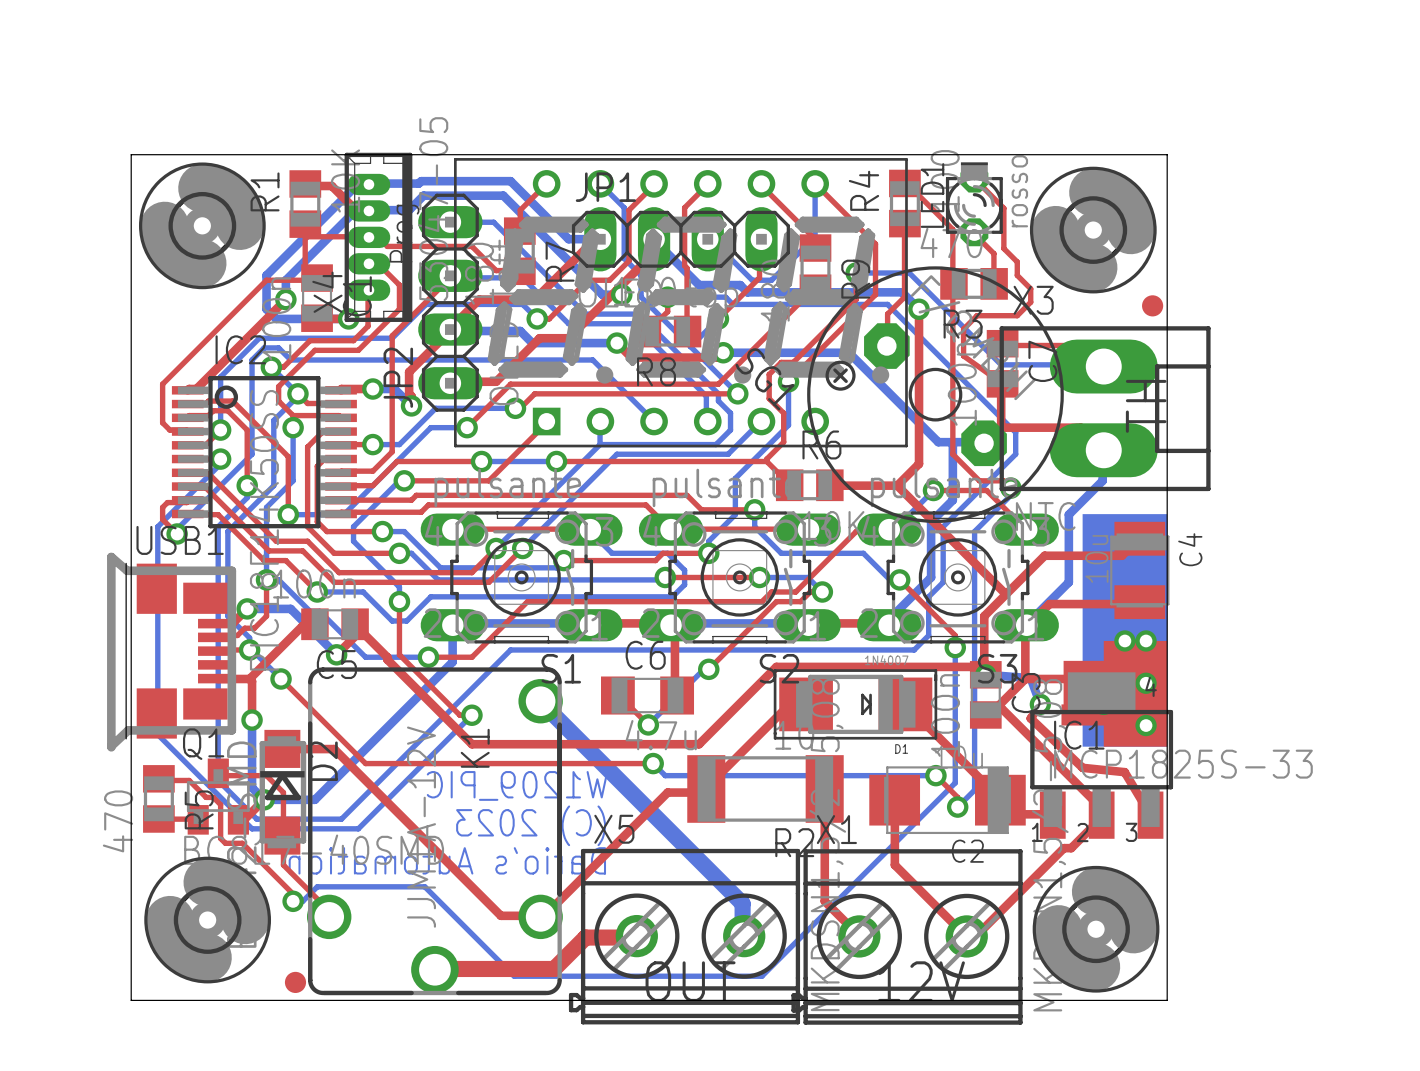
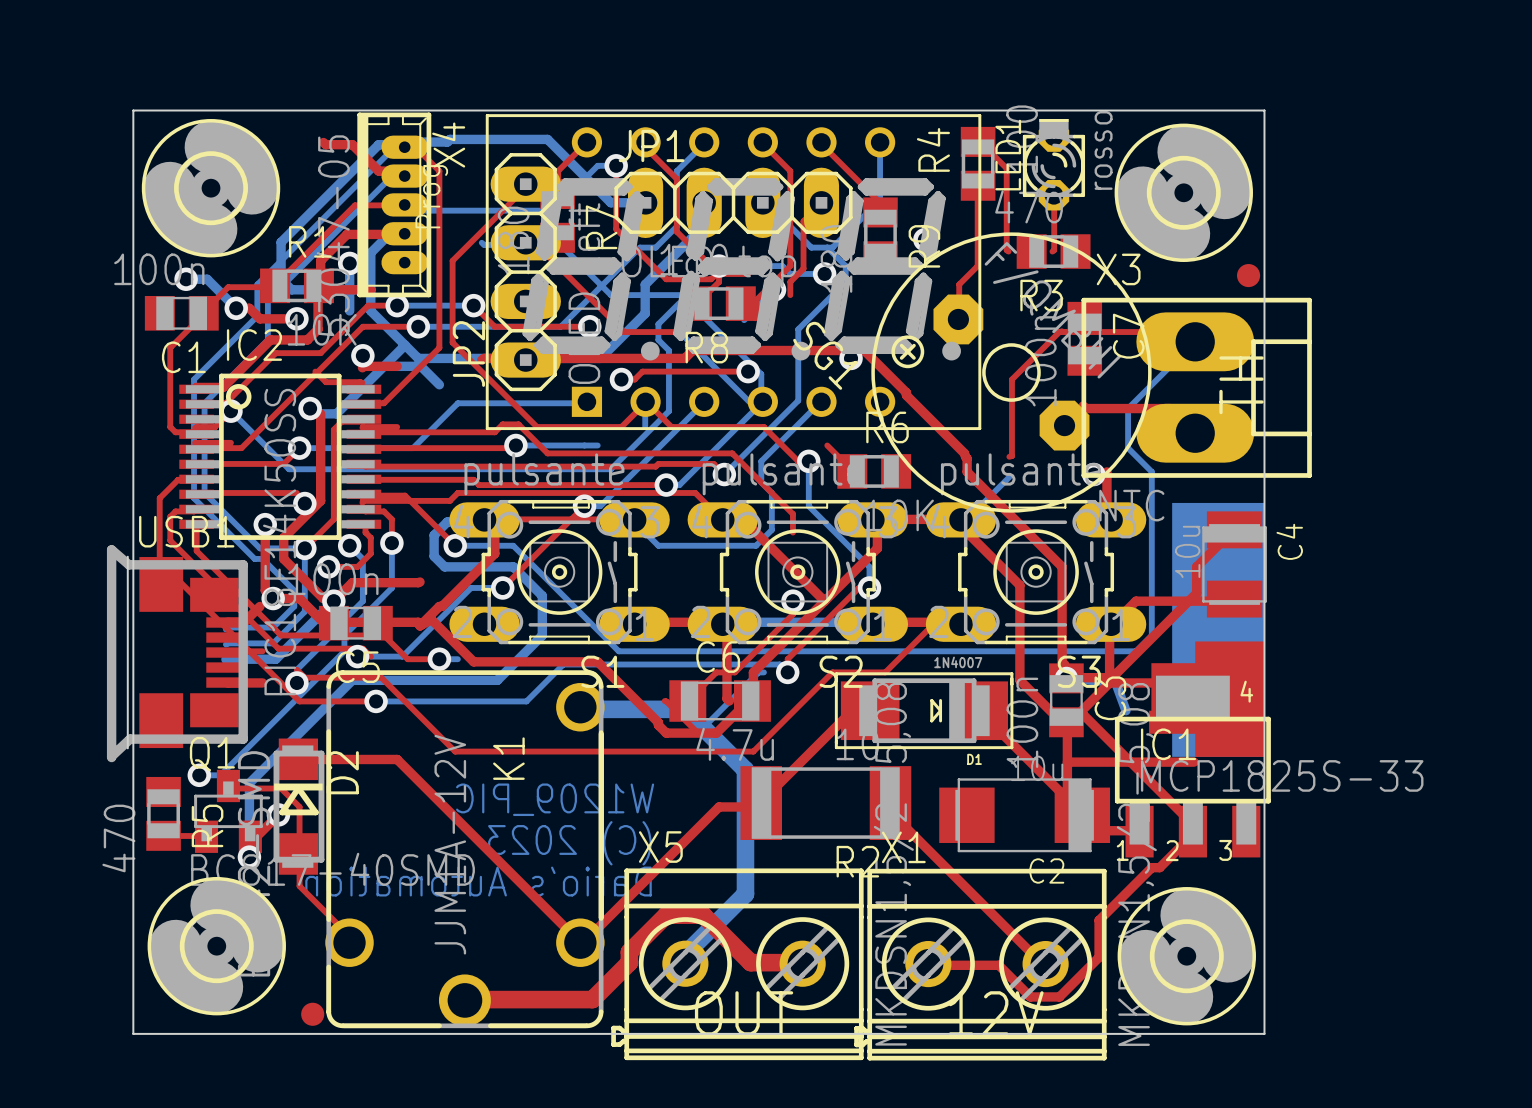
top track: (974, 178) (1003, 208) (1003, 248) (1017, 261) (1017, 275) (1030, 288) (1030, 302) (1017, 315) (977, 315) (963, 329) (963, 355) (1002, 383) (1001, 425) (984, 443) -> none
bottom track: (600, 183) (624, 207) (624, 258) (641, 275) (641, 297) (737, 393) -> none
top track: (654, 183) (629, 210) (629, 217) -> (645, 142) (647, 144) (647, 149) (676, 179)
bottom track: none -> (704, 142) (676, 171) (676, 226) (655, 247) (639, 247) (560, 326) (418, 326)
top track: (707, 183) (684, 207) (687, 331) -> (762, 142) (790, 171) (790, 266) (756, 300) (755, 318)
top track: (815, 183) (875, 244) (875, 294) (788, 381) -> none
bottom track: none -> (404, 147) (394, 147) (257, 284) (257, 316) (194, 379) (194, 498) (254, 558) (262, 558) (294, 590) (294, 606) (273, 627) (228, 627) (225, 629)
top track: none -> (405, 147) (415, 147) (439, 171) (439, 347) (383, 403) (363, 404)
R1 rotation: 0° (305, 204) -> 90° clockwise (297, 285)
R1 position: (305, 204) -> (297, 285)
top track: none -> (616, 165) (616, 229) (666, 279) (711, 279) (716, 273) (748, 273)
bottom track: none -> (616, 165) (597, 165) (552, 210) (410, 210) (404, 204)
via: none -> (616, 165)
top track: (931, 207) (952, 229) (952, 454) (979, 480) (1003, 480) (1010, 488) -> (1006, 168) (1006, 250) (1008, 251)
bottom track: none -> (404, 176) (391, 176) (267, 300) (267, 339) (204, 403) (204, 492) (259, 548) (304, 548) (304, 611) (273, 643) (225, 644)
bottom track: (450, 222) (493, 222) (585, 314) (638, 314) (718, 393) (718, 401) (730, 413) (730, 430) -> (827, 247) (845, 266) (845, 281) (798, 329) (798, 400) (787, 411)
top track: none -> (525, 184) (523, 184) (523, 189) (452, 260) (452, 342) (537, 427) (621, 427) (645, 401) (671, 427) (763, 427) (798, 461) (808, 461)
top track: (974, 234) (993, 253) (994, 283) -> (1054, 197) (1054, 250) (1052, 251)
X4 rotation: 0° (378, 237) -> 180° (394, 204)
top track: (600, 239) (600, 241) (592, 241) (534, 299) (479, 299) (409, 372) (409, 393) (411, 396) (411, 405) -> none
top track: (654, 239) (653, 253) (568, 338) (539, 338) (496, 381) -> none
bottom track: (654, 239) (699, 285) (740, 285) (747, 292) (902, 292) (919, 309) -> (704, 202) (703, 226) (645, 284) (645, 313) (600, 358) (529, 358) (525, 360) (523, 358) (418, 358) (370, 310) (370, 252) (389, 234) (404, 233)
top track: none -> (404, 204) (354, 205) (275, 285) (228, 287) (170, 347) (170, 427) (175, 432) (194, 432) (196, 434)
top track: (759, 241) (759, 277) (718, 318) -> (819, 205) (803, 221) (803, 268) (790, 281) (790, 295)
top track: (629, 260) (609, 280) (587, 280) (549, 318) (537, 318) -> (676, 226) (676, 231) (703, 258)
top track: (368, 263) (370, 265) (380, 265) (399, 285) (399, 309) (358, 350) (314, 350) (278, 386) (278, 401) (293, 415) -> none
top track: none -> (404, 233) (347, 234) (320, 260) (320, 281) (318, 287) (318, 329) (307, 339) (270, 339) (223, 387) (196, 387) (196, 389)
top track: (519, 271) (496, 270) (471, 246) (387, 246) (380, 239) (370, 239) (368, 236) (307, 236) (305, 224) (305, 277) (317, 278) (314, 280) (266, 280) (162, 384) (162, 422) (169, 430) (187, 431) -> none
top track: (856, 273) (856, 299) (793, 362) (781, 362) (769, 374) (769, 398) (783, 413) (783, 442) (766, 459) (766, 461) (556, 461) -> none
bottom track: (856, 273) (909, 273) (1001, 364) (1102, 364) (1103, 366) -> none
top track: (450, 275) (392, 335) (392, 451) (372, 471) (341, 471) (341, 472) -> none
top track: none -> (525, 242) (526, 244) (537, 244) (624, 332) (679, 332)
top track: (815, 288) (718, 384) (510, 384) (467, 427) -> none
top track: (368, 290) (368, 326) (353, 340) (310, 340) (283, 367) (271, 367) -> none
bottom track: none -> (349, 263) (349, 310)
via: none -> (349, 263)
bottom track: (621, 294) (602, 294) (503, 195) (423, 195) (409, 210) (372, 210) (368, 212) (353, 212) (285, 280) (285, 299) -> none
via: (621, 294) -> none
C1 rotation: 0° (317, 298) -> 90° clockwise (181, 313)
C1 position: (317, 298) -> (181, 313)
top track: (285, 299) (196, 389) (187, 390) -> none
via: (285, 299) -> none
JP2 position: (450, 302) -> (525, 272)
bottom track: (764, 304) (887, 304) (1015, 432) (1015, 454) (943, 526) (943, 582) (928, 596) (928, 635) (914, 649) -> (1195, 341) (1128, 408) (1128, 448) (1151, 471) (1151, 635) (1135, 651) (988, 651)
via: none -> (824, 273)
bottom track: none -> (186, 279) (207, 279) (236, 308)
via: none -> (186, 279)
top track: (919, 309) (919, 463) (897, 485) -> none
via: (919, 309) -> none
via: (348, 318) -> none
bottom track: (537, 318) (522, 304) (426, 304) (392, 338) (259, 338) (220, 376) (220, 430) -> none
via: (537, 318) -> none
bottom track: (450, 329) (520, 331) (532, 343) (616, 343) -> none
bottom track: none -> (679, 303) (658, 324) (658, 339) (668, 350) (668, 411) (610, 469) (289, 469) (238, 419)
top track: none -> (397, 305) (368, 305) (320, 353) (275, 353) (225, 403) (196, 404)
bottom track: none -> (397, 305) (473, 305)
via: none -> (397, 305)
top track: none -> (473, 305) (494, 326) (589, 326)
via: none -> (473, 305)
top track: none -> (236, 308) (249, 308) (259, 318) (296, 318)
via: none -> (236, 308)
top track: (616, 343) (631, 357) (718, 357) (723, 352) -> none
via: (616, 343) -> none
top track: (1002, 343) (1003, 345) (1083, 345) (1095, 357) -> (1009, 456) (1011, 456) (1011, 379) (1059, 332) (1186, 332)
via: none -> (296, 318)
top track: none -> (418, 326) (362, 326) (241, 448) (196, 449)
via: none -> (418, 326)
via: none -> (589, 326)
bottom track: (723, 352) (848, 352) (938, 442) (984, 443) -> none
via: (723, 352) -> none
bottom track: none -> (679, 332) (756, 408) (762, 401) (679, 485) (666, 485)
bottom track: (271, 367) (297, 393) (297, 396) (273, 420) (273, 485) (227, 531) (227, 616) (249, 637) (249, 649) (252, 649) (281, 678) -> none
via: (271, 367) -> none
bottom track: none -> (405, 345) (336, 413) (320, 413)
via: none -> (362, 355)
bottom track: (788, 381) (788, 425) (735, 478) (735, 514) (708, 541) (708, 553) -> none
via: (372, 389) -> none
via: (297, 393) -> none
top track: (597, 393) (534, 393) (520, 408) (515, 408) -> (642, 371) (634, 379) (621, 379)
top track: (694, 393) (737, 393) -> none
via: none -> (748, 371)
via: (737, 393) -> none
via: none -> (621, 379)
top track: (187, 404) (206, 403) (208, 401) (232, 401) (288, 456) (288, 514) -> none
via: (411, 405) -> none
bottom track: (515, 408) (435, 408) (399, 444) (372, 444) -> none
via: (515, 408) -> none
top track: (293, 415) (339, 415) (341, 417) -> none
top track: (187, 417) (189, 415) (208, 415) (213, 410) (227, 410) (247, 430) (247, 485) -> none
top track: (546, 421) (488, 480) -> (724, 474) (713, 463) (658, 463) (655, 466) (523, 466)
bottom track: none -> (586, 401) (457, 403) (413, 448) (299, 448)
bottom track: (654, 421) (592, 360) (290, 360) (278, 347) (264, 347) (252, 360) (252, 454) (177, 529) (177, 533) -> (704, 401) (600, 506) (584, 506)
bottom track: (293, 427) (293, 480) (266, 507) (266, 579) (278, 579) (310, 611) (319, 611) (365, 657) (411, 657) -> none
bottom track: (467, 427) (430, 427) (343, 514) (288, 514) -> none
via: (467, 427) -> none
top track: (341, 431) (322, 432) (307, 446) (307, 526) (334, 553) (399, 553) -> none
top track: none -> (320, 413) (320, 500) (283, 537) (283, 558) (323, 598) (331, 598) (333, 601) (352, 582) (420, 582)
top track: none -> (363, 419) (362, 421) (341, 421) (333, 429) (333, 519) (304, 548)
bottom track: (952, 442) (952, 500) (931, 521) (931, 577) (890, 618) (889, 625) -> none
via: (372, 444) -> none
bottom track: (716, 444) (600, 444) (496, 548) -> (771, 427) (724, 474)
bottom track: (1103, 450) (1102, 480) (1068, 514) (1068, 582) (1026, 625) -> none
top track: none -> (363, 434) (365, 432) (494, 432) (502, 424) (518, 424) (547, 453) (732, 453) (792, 514) (792, 532)
IC2 position: (264, 452) -> (280, 456)
bottom track: (728, 454) (616, 454) (522, 548) -> (785, 437) (761, 461) (761, 482) (771, 492) (771, 529) (756, 545) (719, 545)
bottom track: (220, 459) (220, 463) (157, 526) (157, 734) (252, 828) (358, 828) (471, 715) -> none
via: (220, 459) -> none
top track: (341, 459) (324, 459) (317, 466) (317, 521) (326, 531) (382, 531) -> none
top track: none -> (510, 445) (508, 448) (363, 449)
top track: (481, 461) (397, 461) (372, 485) (341, 486) -> none
via: (556, 461) -> none
top track: none -> (299, 448) (283, 463) (196, 463)
via: none -> (299, 448)
top track: (187, 472) (208, 473) (276, 541) (307, 541) (339, 572) (471, 572) (496, 548) -> none
bottom track: none -> (808, 461) (808, 506) (869, 566) (869, 587)
top track: none -> (363, 464) (365, 466) (431, 466)
bottom track: (404, 480) (399, 480) (353, 526) (353, 541) (399, 587) (399, 601) -> none
via: (404, 480) -> none
bottom track: (247, 485) (247, 497) (218, 526) (218, 780) (256, 819) (341, 819) (510, 649) (575, 649) -> (455, 545) (513, 545) (618, 651)
via: (247, 485) -> none
top track: (829, 485) (897, 485) -> none
top track: (897, 485) (1006, 594) -> none
top track: none -> (1106, 471) (1106, 519) (1108, 520)
top track: (187, 486) (206, 488) (268, 550) (302, 550) (334, 582) (488, 582) (522, 548) -> none
via: none -> (724, 474)
bottom track: (1010, 488) (1010, 495) (974, 531) (974, 790) (957, 807) -> none
top track: (933, 490) (986, 490) (1026, 529) -> none
via: (933, 490) -> none
top track: none -> (196, 479) (178, 479) (159, 498) (159, 561) (299, 701) (376, 701)
top track: none -> (363, 479) (473, 479) (478, 485) (666, 485)
via: none -> (666, 485)
top track: (187, 500) (186, 502) (167, 502) (162, 507) (162, 519) (177, 533) -> none
top track: (341, 500) (411, 500) (416, 495) (687, 495) (701, 509) (754, 509) -> none
top track: none -> (296, 492) (196, 494)
top track: none -> (363, 494) (405, 495) (455, 545)
bottom track: (754, 509) (754, 526) (781, 553) (863, 553) (890, 579) (899, 579) -> none
via position: (754, 509) -> (808, 461)
top track: (187, 514) (218, 514) (264, 560) (285, 560) (317, 591) -> none
top track: none -> (584, 506) (502, 587)
via: none -> (584, 506)
top track: none -> (196, 509) (194, 511) (175, 511) (170, 516) (170, 540) (278, 648) (362, 648) (370, 656)
top track: none -> (363, 509) (365, 511) (383, 511) (391, 519) (391, 543)
top track: none -> (496, 520) (494, 522) (494, 553) (420, 625)
bottom track: none -> (496, 520) (494, 522) (447, 522) (434, 535) (434, 556) (444, 566) (513, 566) (542, 595) (542, 635) (497, 680) (352, 680) (249, 783) (249, 857)
top track: (689, 529) (808, 529) -> (742, 519) (824, 601)
top track: (889, 529) (887, 531) (856, 531) (795, 591) (771, 591) (761, 601) (527, 601) (471, 657) (428, 657) -> none
bottom track: (382, 531) (404, 531) (440, 567) (556, 567) (563, 560) -> none
via: (382, 531) -> none
via: (177, 533) -> none
top track: none -> (196, 524) (196, 551) (281, 635) (383, 635) (407, 659) (439, 659)
top track: none -> (265, 524) (265, 590) (273, 598) (299, 598) (323, 622) (418, 622) (420, 625)
via: none -> (265, 524)
top track: none -> (363, 524) (365, 532) (370, 537) (370, 553) (357, 566) (328, 566)
via: (496, 548) -> none
via: (522, 548) -> none
bottom track: none -> (391, 543) (391, 587) (344, 635) (344, 651) (220, 775) (199, 775)
via: none -> (391, 543)
bottom track: none -> (349, 545) (362, 558) (362, 601) (296, 669)
via: none -> (349, 545)
bottom track: (399, 553) (411, 553) (438, 579) (662, 579) (665, 577) -> none
via: (399, 553) -> none
via: none -> (455, 545)
bottom track: (667, 553) (684, 570) (684, 584) (672, 596) (430, 596) (406, 620) (392, 620) (363, 591) (317, 591) -> none
top track: (708, 553) (662, 553) (655, 560) (563, 560) -> none
via: (708, 553) -> none
via: none -> (304, 548)
top track: (1122, 555) (1044, 555) (984, 616) (984, 674) (985, 674) (981, 666) (776, 666) (699, 744) (471, 744) (387, 659) (387, 657) (355, 624) (358, 633) (336, 654) -> (1215, 548) (1196, 566) (1196, 593) (1112, 677) (1062, 677) (1062, 566) (967, 471) (967, 458) (964, 453) (864, 350) (692, 350) (684, 358) (531, 358)
via: (563, 560) -> none
via: none -> (328, 566)
top track: (665, 577) (759, 577) -> none
via: (665, 577) -> none
bottom track: (759, 577) (807, 577) (822, 591) -> none
via: (759, 577) -> none
top track: (266, 579) (266, 616) (254, 628) (244, 628) (237, 635) (218, 635) (215, 637) -> none
via: (266, 579) -> none
top track: (899, 579) (955, 635) (955, 647) -> none
via: (899, 579) -> none
via: (317, 591) -> none
bottom track: none -> (502, 587) (471, 587) (402, 656) (370, 656)
via: none -> (502, 587)
top track: none -> (869, 587) (858, 587) (787, 659) (787, 672)
top track: (822, 591) (810, 591) (800, 601) (776, 601) (708, 669) -> none
via position: (822, 591) -> (869, 587)
top track: (399, 601) (399, 654) (459, 715) (471, 715) -> none
via: (399, 601) -> none
bottom track: none -> (333, 601) (275, 659) (225, 659)
via: none -> (333, 601)
top track: none -> (792, 601) (792, 614) (734, 672) (716, 672) (687, 701)
via: none -> (792, 601)
bottom track: (247, 608) (290, 608) (336, 654) -> none
via position: (247, 608) -> (273, 598)
top track: (314, 624) (314, 625) (302, 625) (249, 678) (252, 681) (252, 720) -> none
bottom track: (590, 625) (587, 623) (455, 623) (452, 625) (452, 662) (314, 799) (264, 799) (252, 787) (252, 720) -> none
top track: none -> (958, 624) (932, 624) (885, 672) (832, 672) (753, 751) (455, 751) (381, 677) (304, 677) (296, 669)
top track: none -> (420, 625) (431, 619) (473, 661) (597, 661) (658, 722) (658, 725) (666, 733) (716, 733) (748, 701) (752, 701) (753, 672) (877, 548) (877, 520) (956, 519) (958, 520) (959, 524) (1019, 585) (1019, 680) (1062, 722) (1067, 722) (1067, 804) (1077, 813)
via: (1124, 640) -> none
via: (1146, 640) -> none
bottom track: (955, 647) (955, 782) (761, 976) (514, 976) (424, 886) (317, 886) (302, 901) (293, 901) -> none
via: (955, 647) -> none
via: (249, 649) -> none
via position: (428, 657) -> (439, 659)
via position: (708, 669) -> (787, 672)
bottom track: none -> (787, 672) (779, 664) (563, 664) (526, 701) (376, 701)
top track: (281, 678) (365, 763) (653, 763) -> none
via: (1146, 683) -> none
via: none -> (376, 701)
C6 position: (647, 695) -> (720, 701)
bottom track: (542, 703) (742, 903) (742, 935) (744, 936) -> (581, 709) (684, 709) (745, 770) (745, 894) (687, 952) (687, 962) (685, 963)
top track: (1040, 704) (1030, 718) (1082, 767) (1124, 772) (1150, 815) -> none
via: (1040, 704) -> none
via: (471, 715) -> none
via: (252, 720) -> none
via: (648, 724) -> none
via: (1146, 725) -> none
top track: (334, 749) (500, 915) (539, 915) -> (354, 759) (397, 759) (579, 941)
top track: none -> (1067, 762) (1194, 762)
via: none -> (199, 775)
bottom track: (653, 763) (665, 775) (935, 775) -> none
via: (653, 763) -> none
top track: (935, 775) (957, 797) (957, 807) -> none
via: (935, 775) -> none
top track: (158, 778) (160, 780) (189, 780) (206, 797) (213, 797) (220, 804) (220, 838) (225, 843) (242, 843) (293, 894) (293, 901) -> none
top track: (824, 797) (824, 901) (859, 936) -> (890, 812) (1043, 965) (1045, 964)
top track: (894, 800) (894, 865) (964, 935) (977, 935) (1015, 896) -> (928, 964) (998, 965) (1030, 996) (1059, 996) (1099, 957) (1099, 920)
via: (957, 807) -> none
via: none -> (249, 857)
via: (293, 901) -> none
top track: (636, 936) (585, 937) (554, 968) (551, 968) -> (802, 963) (750, 962) (703, 915) (666, 915) (629, 952) (629, 962) (592, 999)

